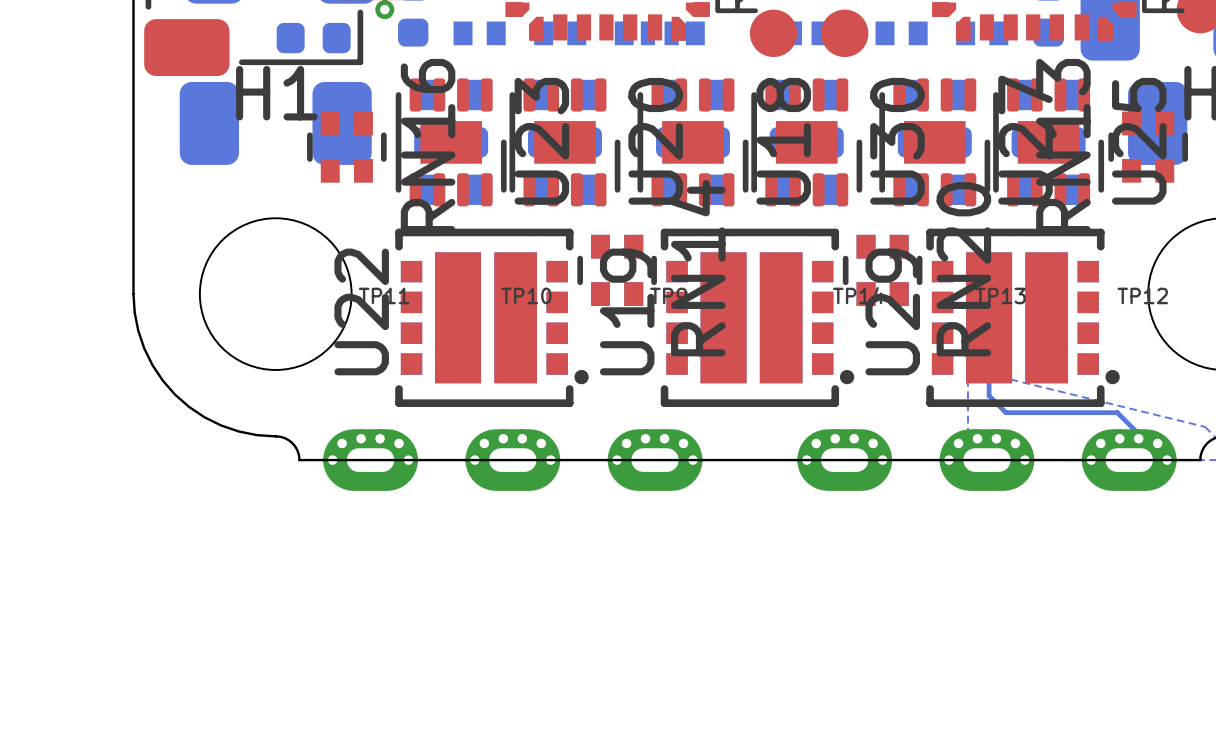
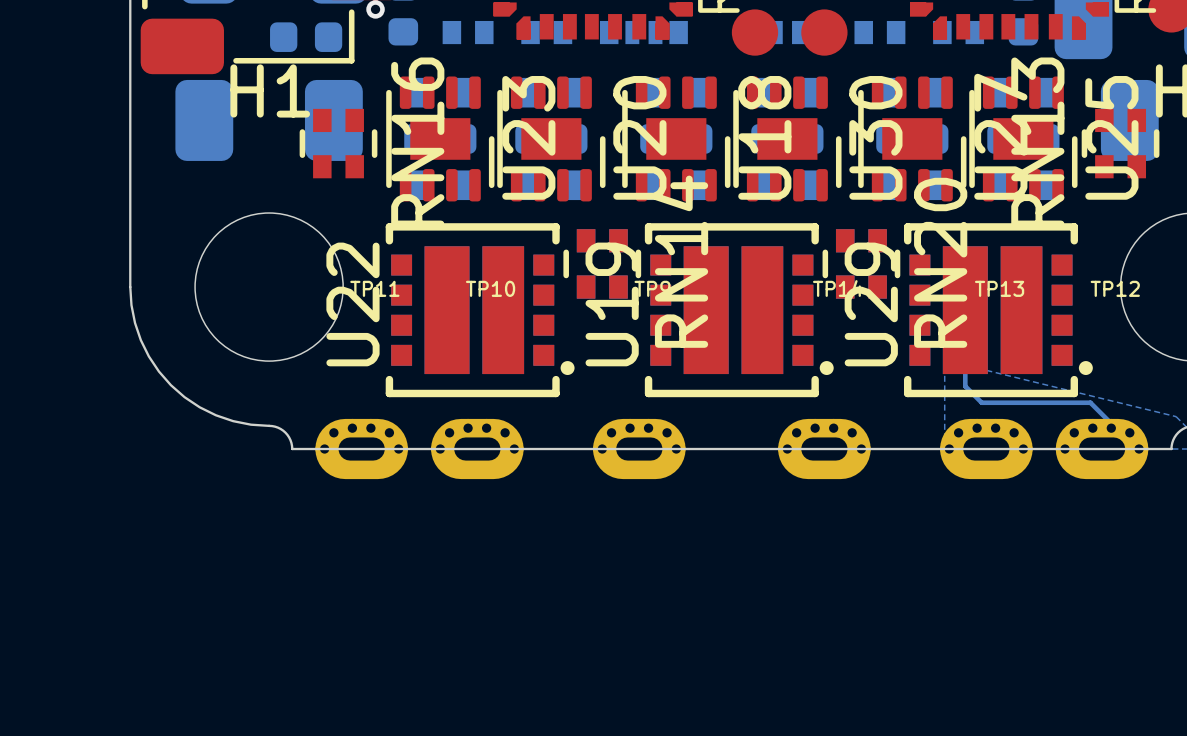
TP10 position: (512, 460) -> (477, 449)
TP13 position: (986, 460) -> (986, 449)

